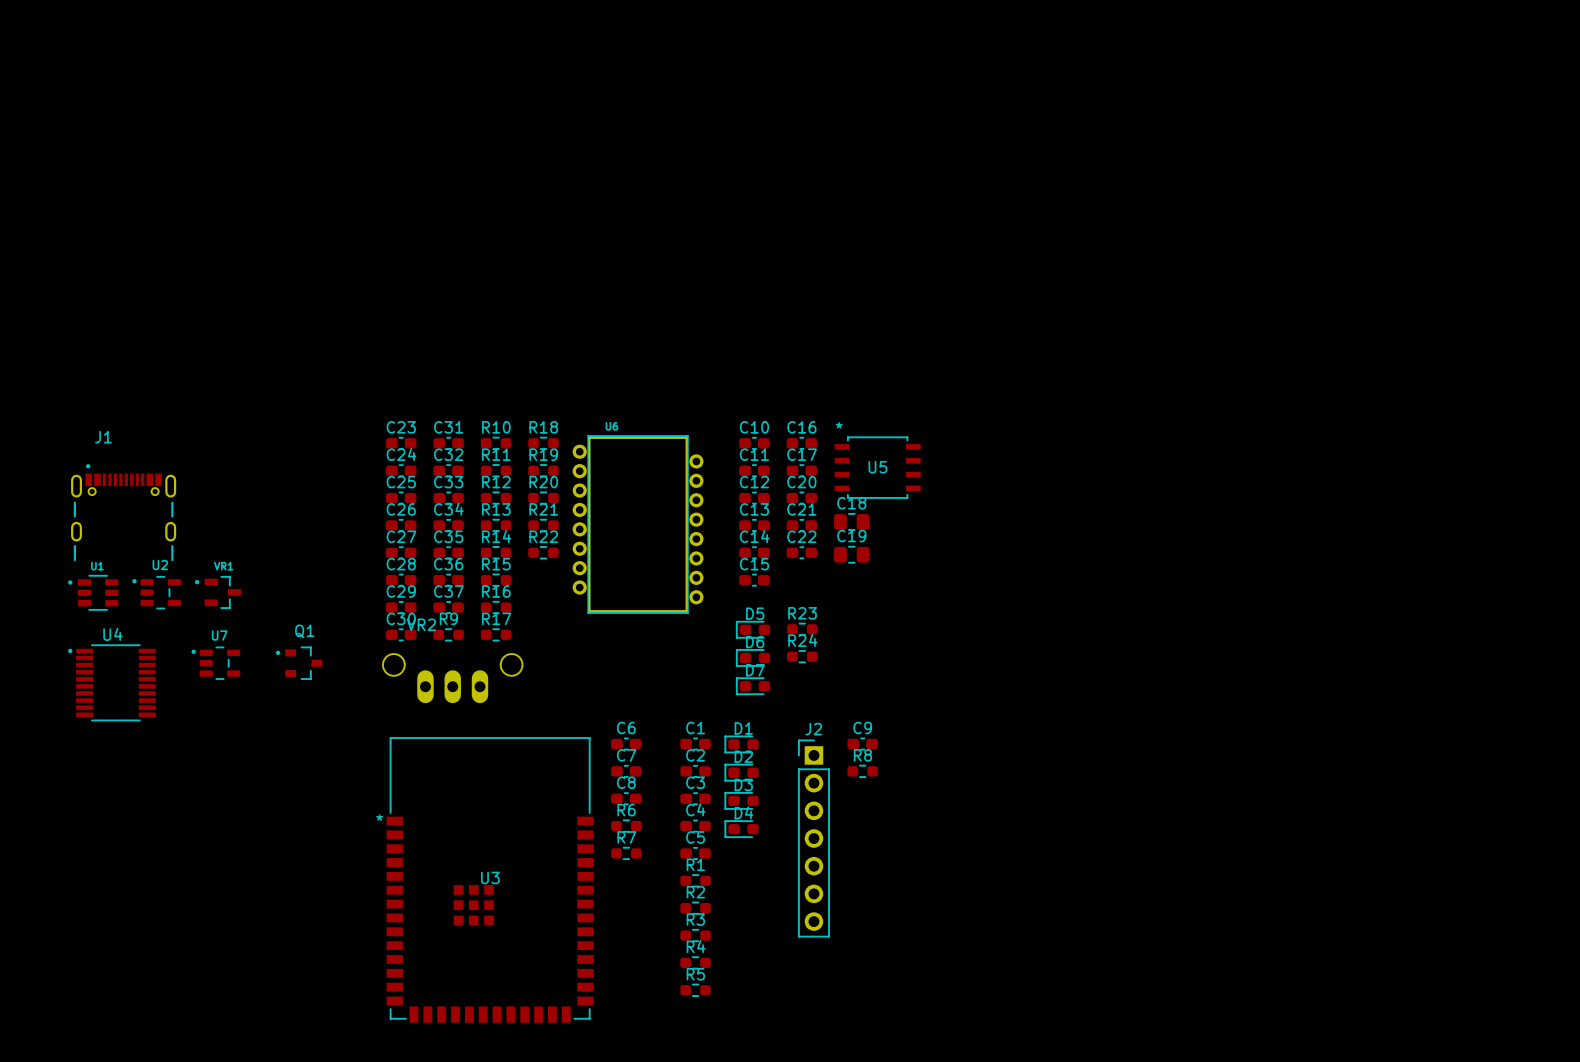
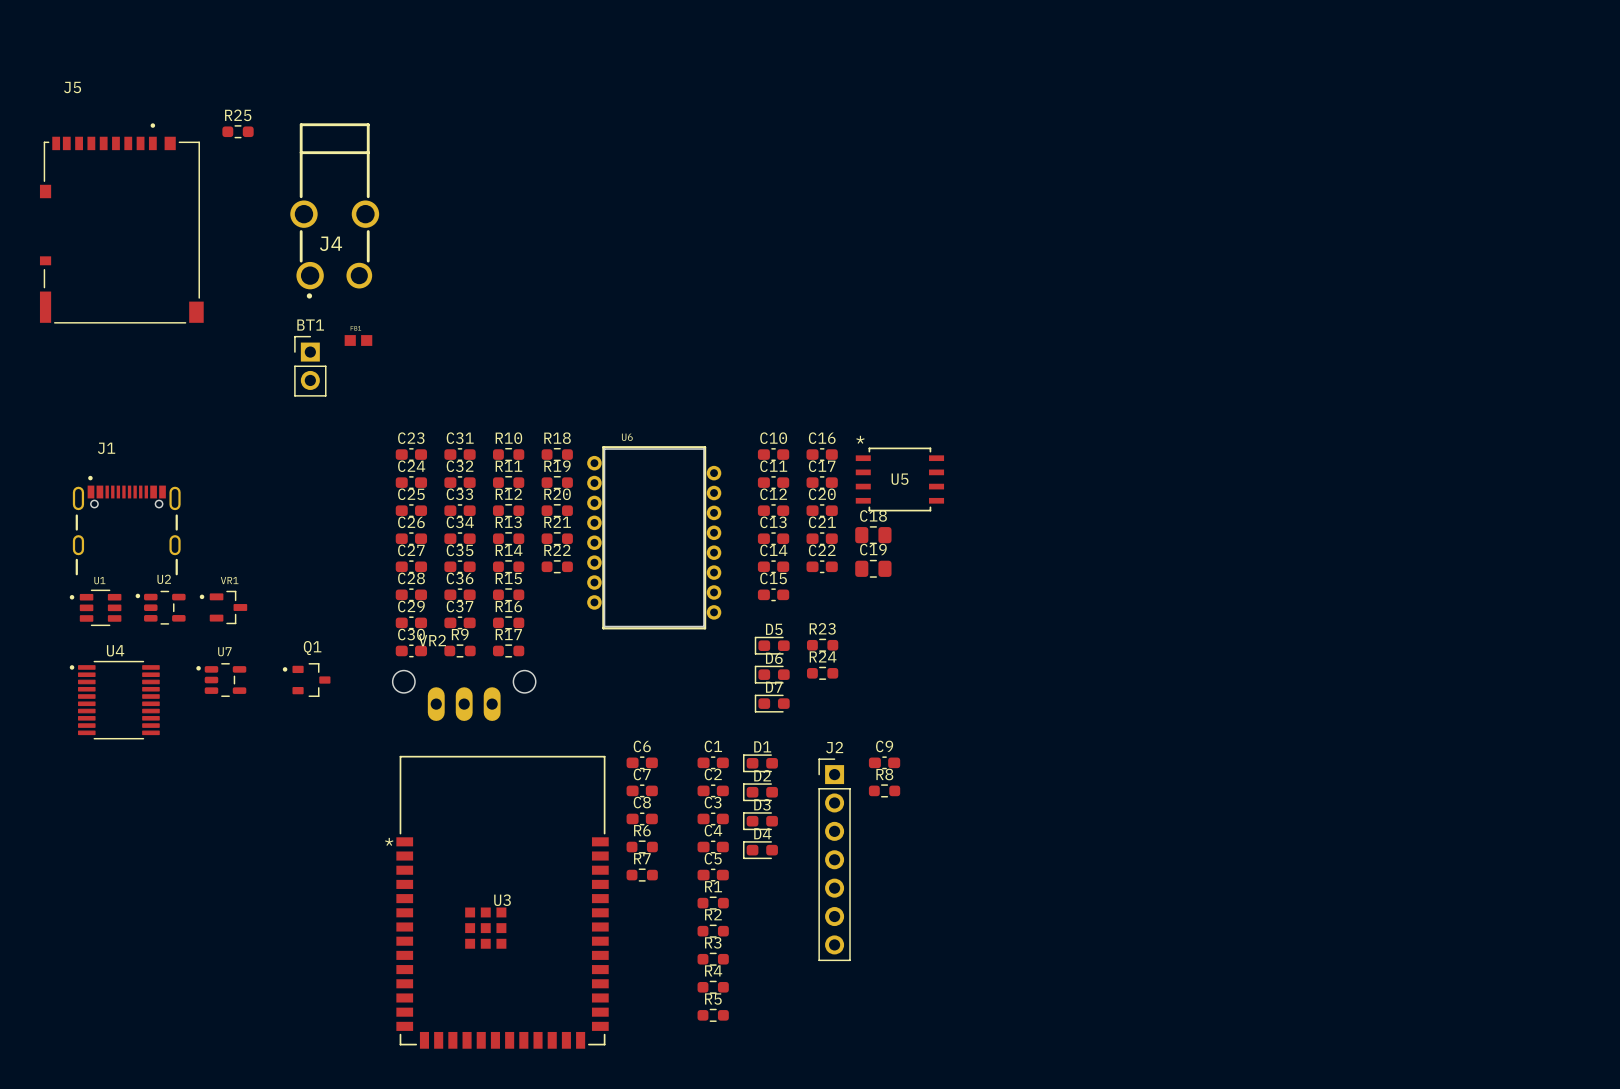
R25: none -> (238, 131)
J4: none -> (334, 210)
J5: none -> (121, 223)
part: none -> (358, 340)
BT1: none -> (310, 366)

